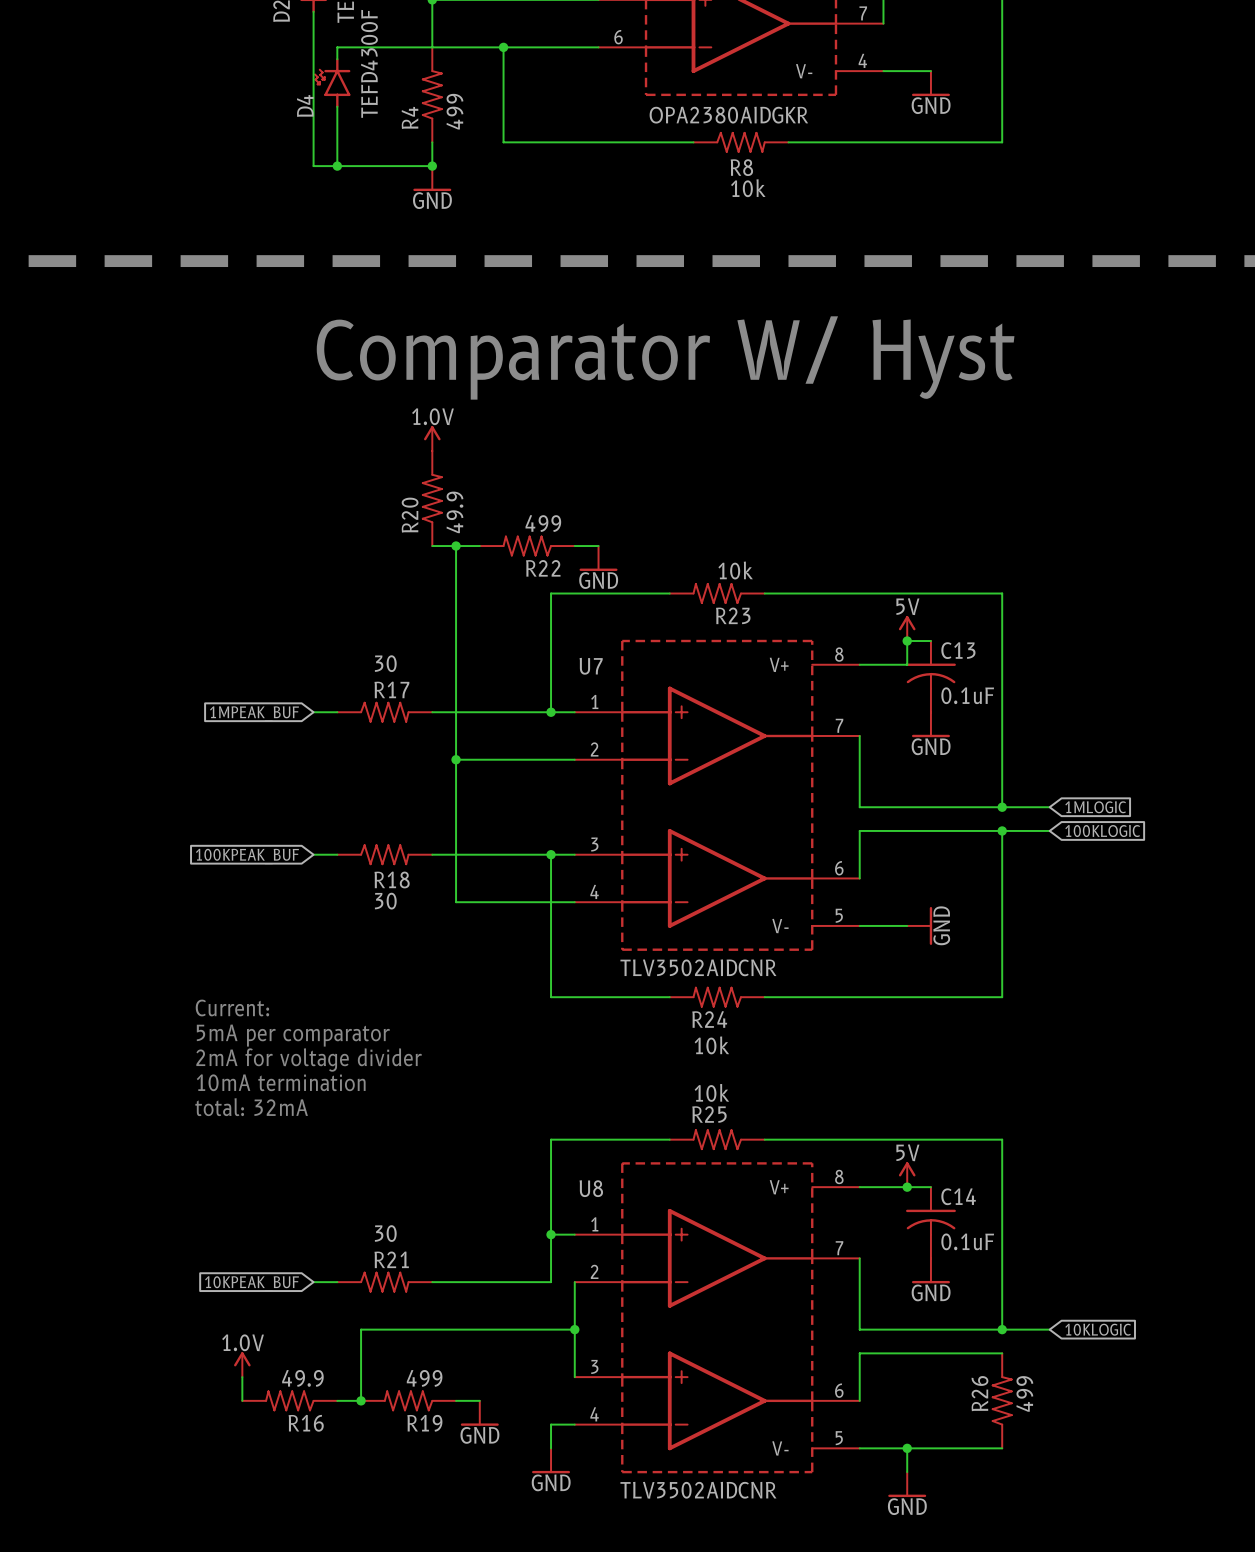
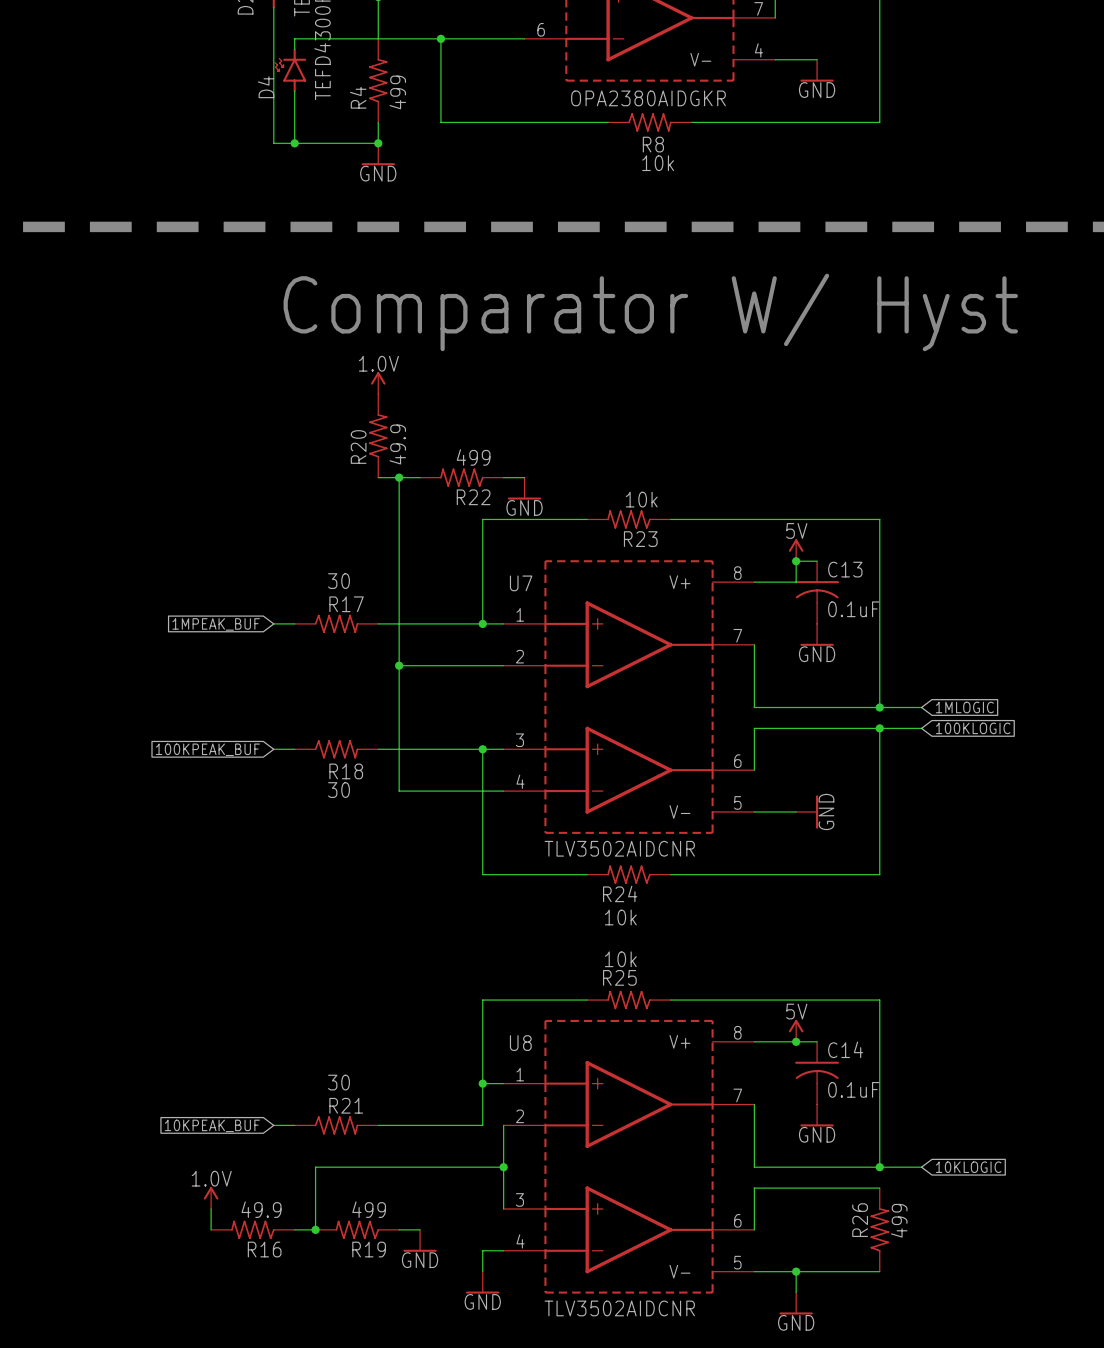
text: Current: (232, 1007) -> none
text: 5mA per comparator (293, 1035) -> none
text: 2mA for voltage divider (309, 1060) -> none
text: 10mA termination (281, 1082) -> none
text: total: 32mA (251, 1107) -> none

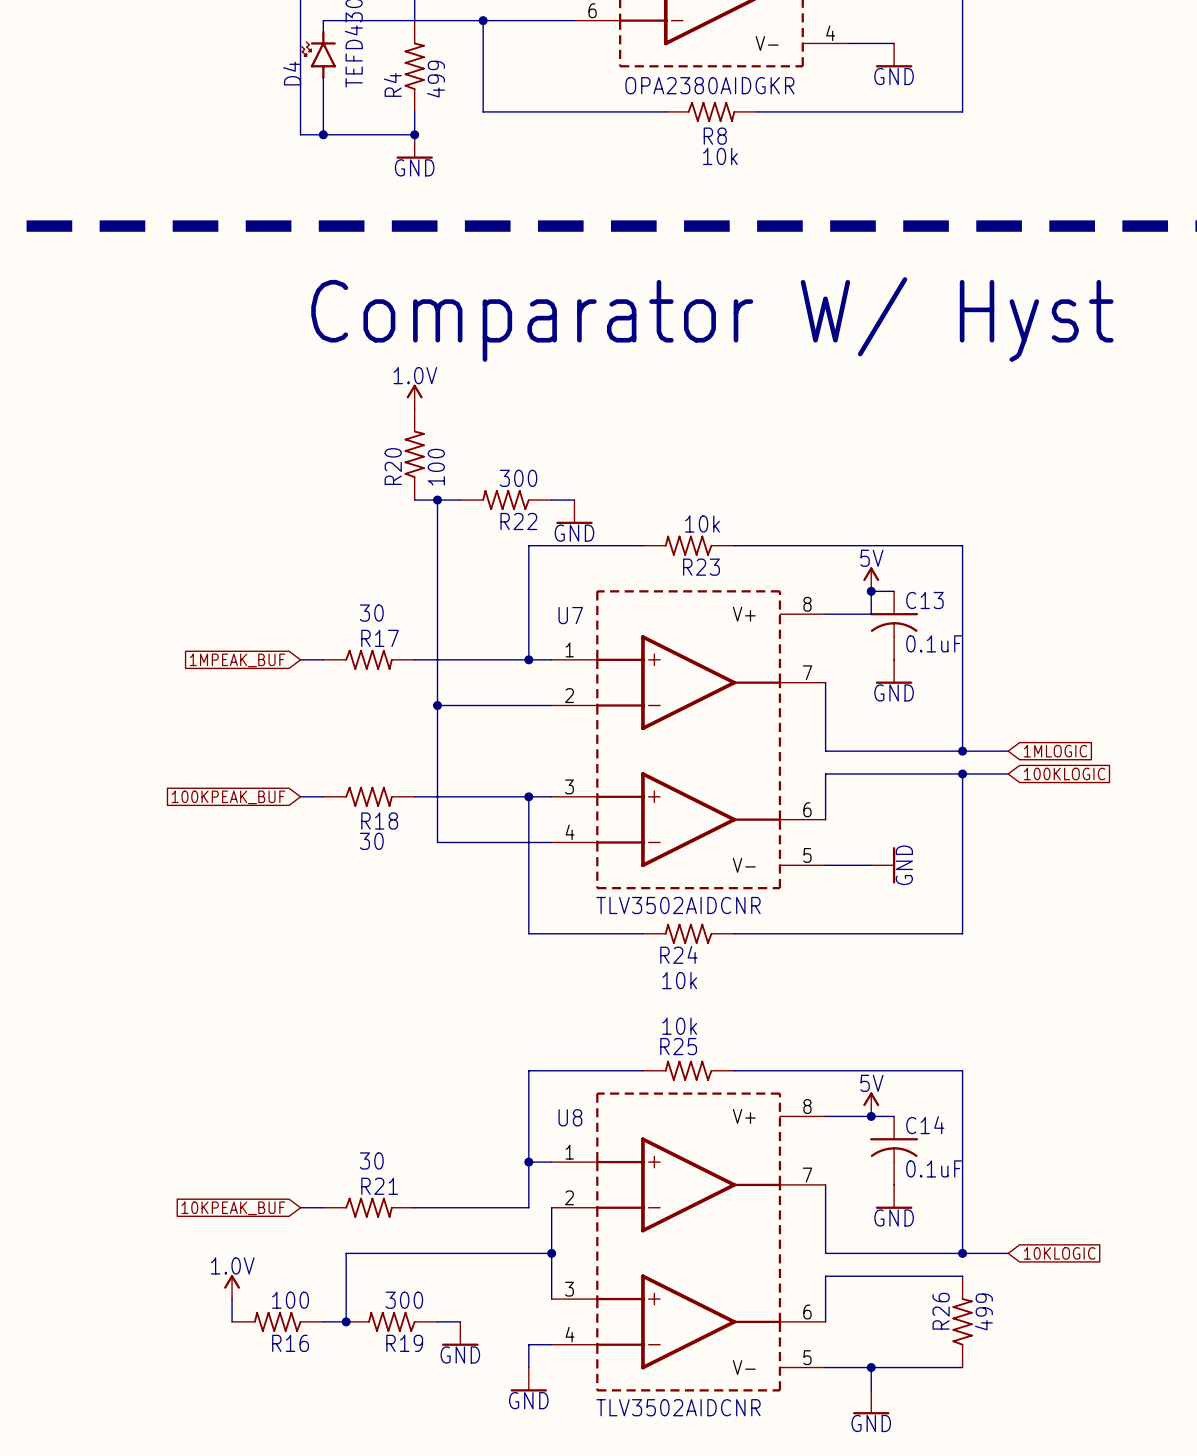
R20 value: 49.9 (397, 444) -> 100 (436, 467)
R22 value: 499 (473, 457) -> 300 (518, 478)
R16 value: 49.9 (261, 1209) -> 100 (290, 1300)
R19 value: 499 (369, 1209) -> 300 (404, 1300)

